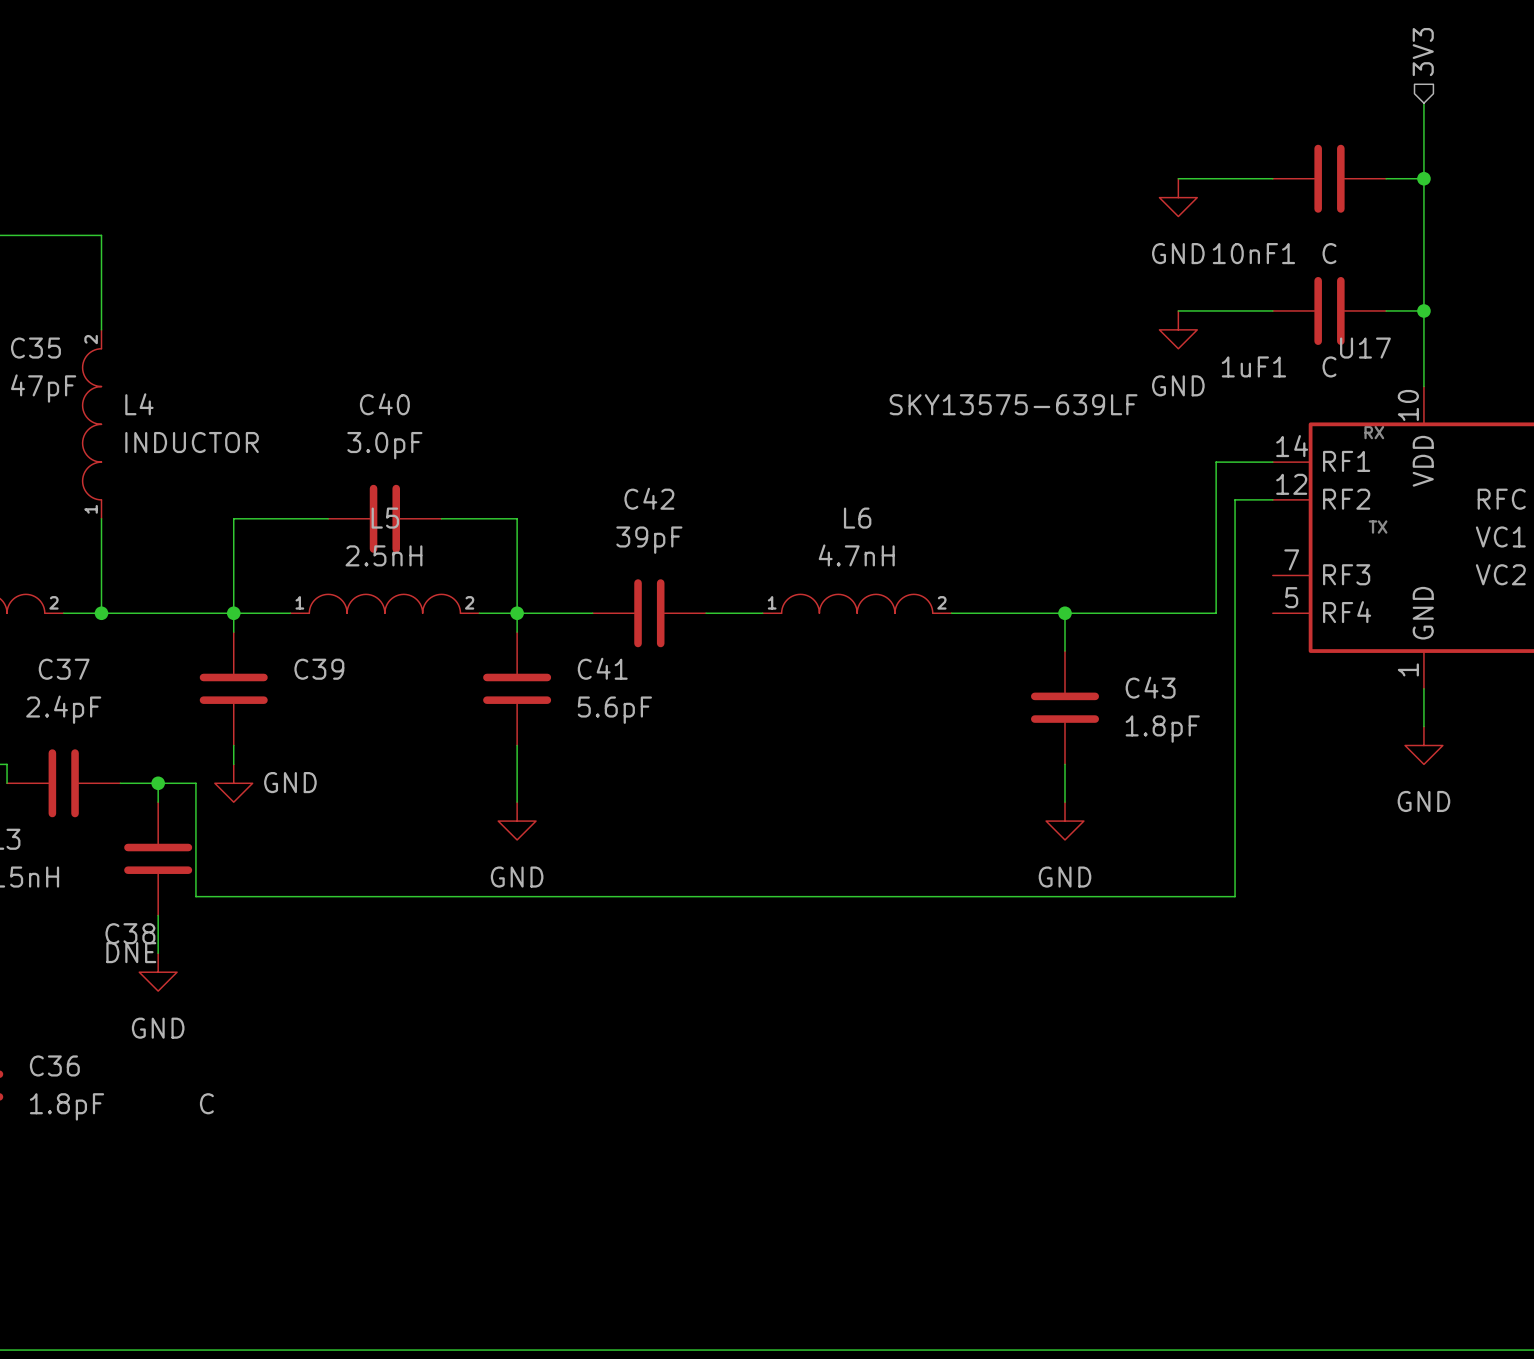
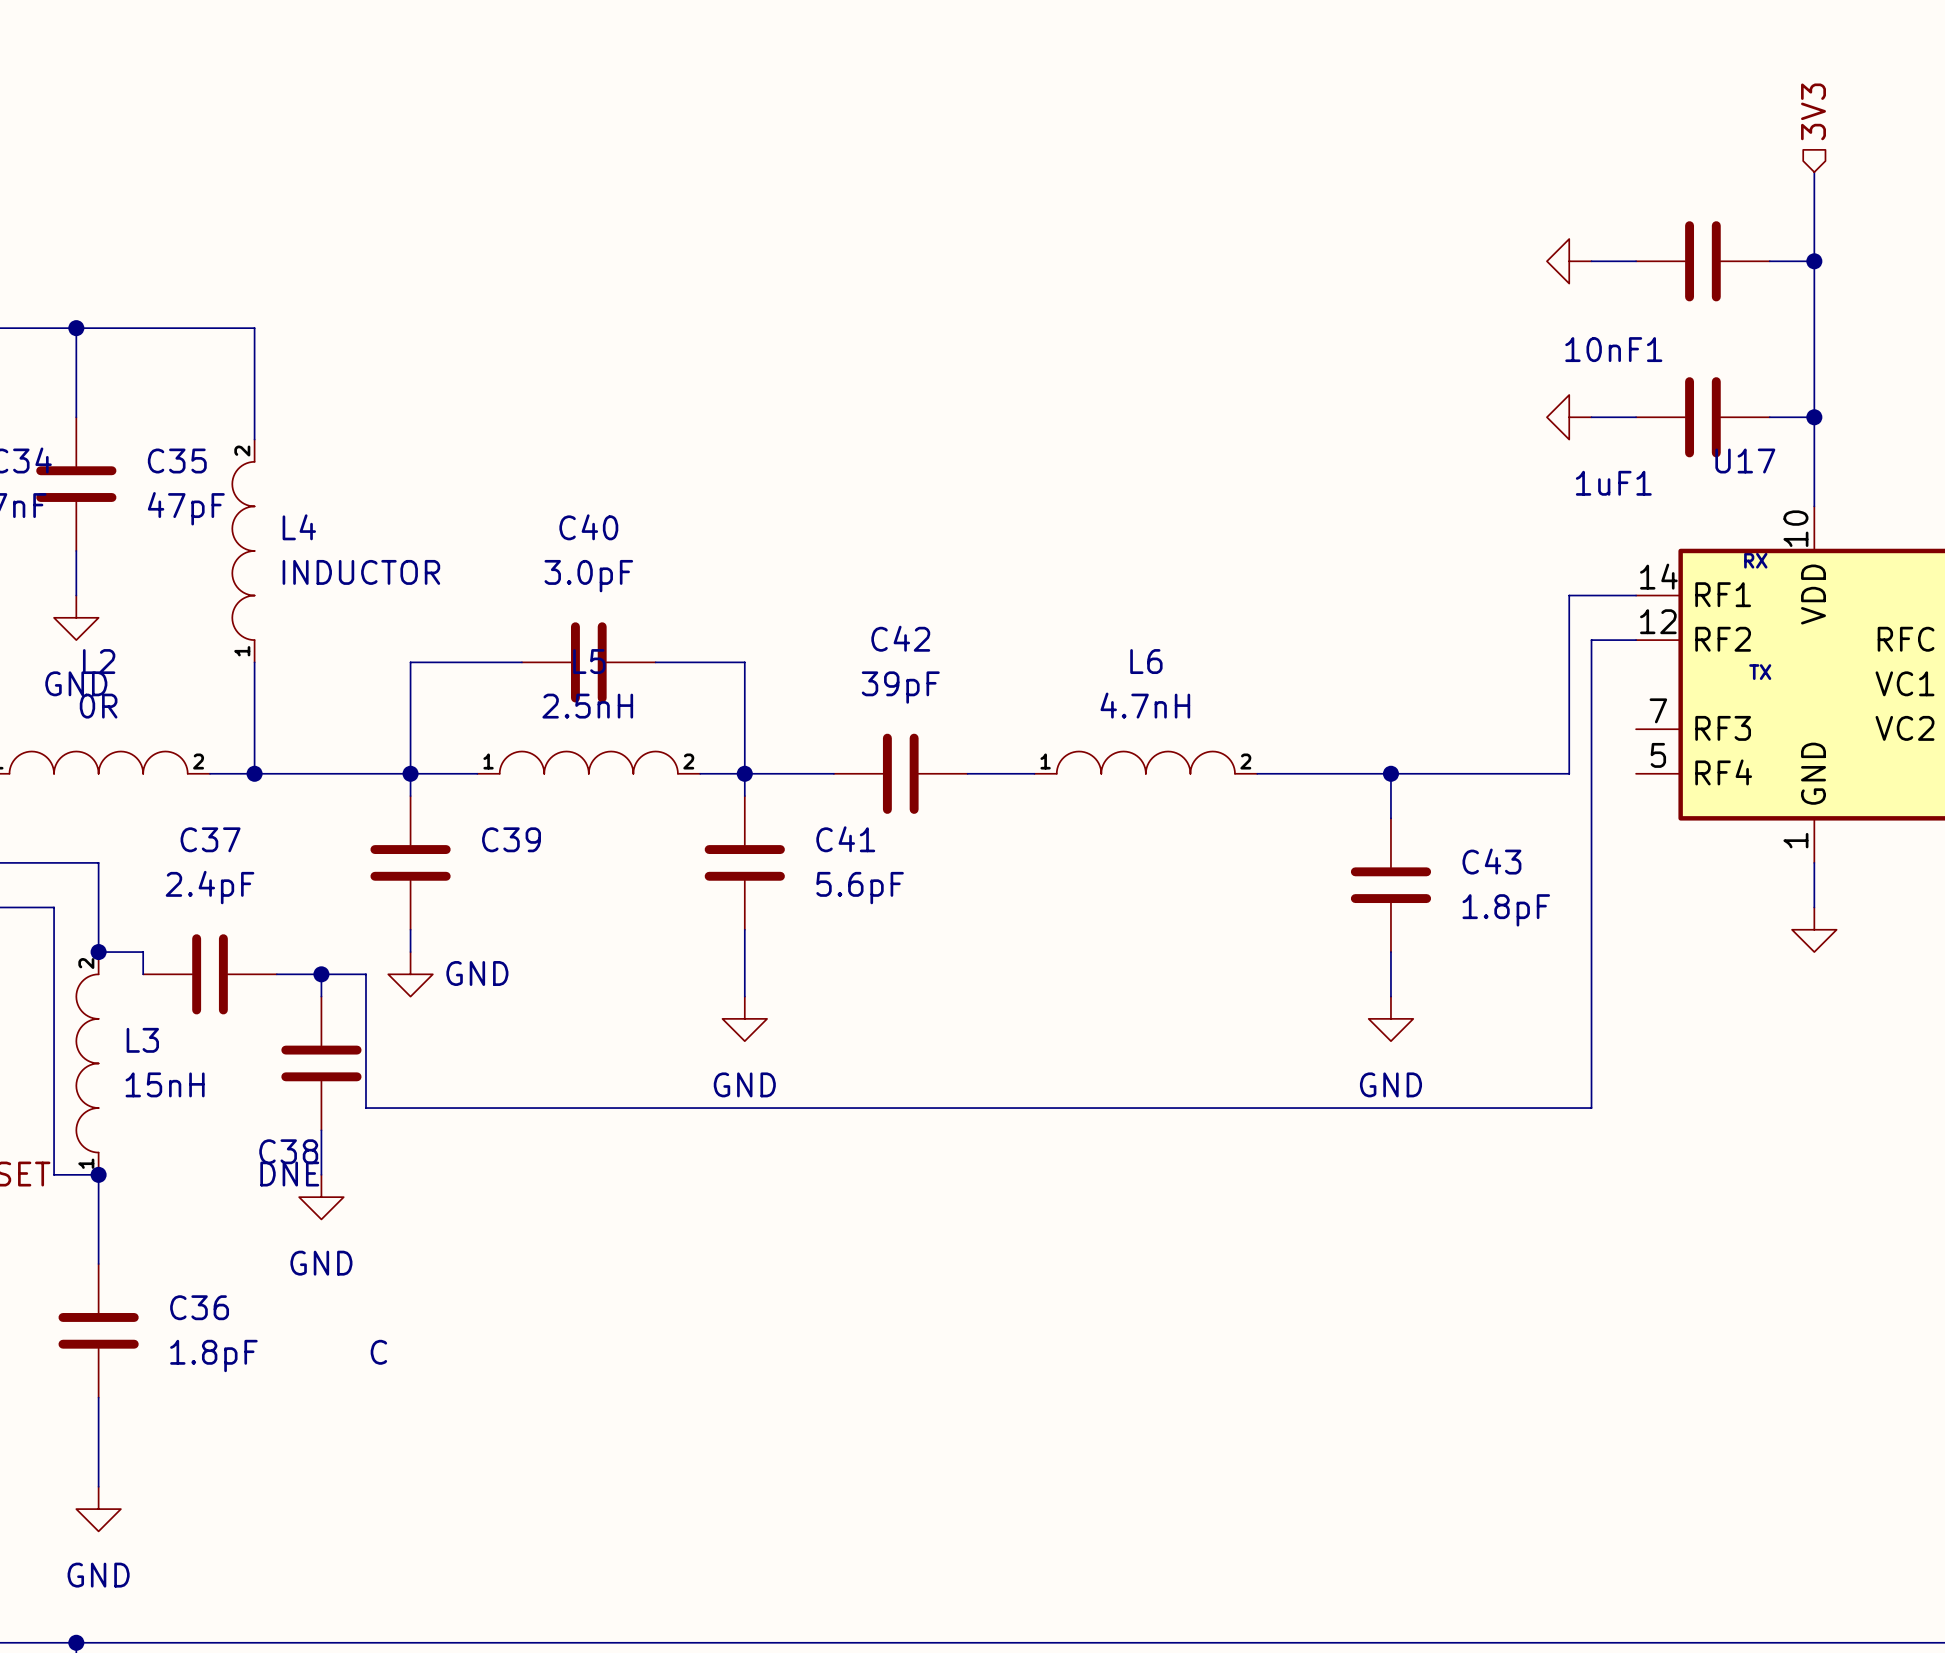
wire: (1178, 178) (1235, 178) -> none
power symbol: none -> (1569, 261)
power symbol: GND (1178, 197) -> none
10nF1 value: C (1329, 253) -> none
wire: (1178, 310) (1235, 310) -> none
power symbol: none -> (1569, 417)
power symbol: GND (1178, 329) -> none
1uF1 value: C (1329, 366) -> none
U17 value: SKY13575-639LF (1013, 404) -> none
power symbol text: GND (1423, 801) -> none

